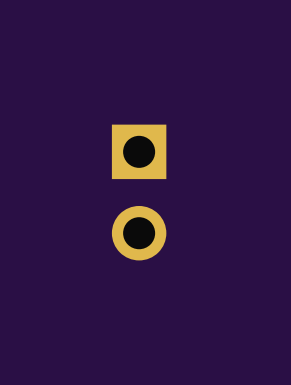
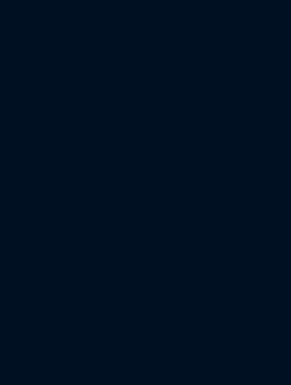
part: (139, 192) -> none

